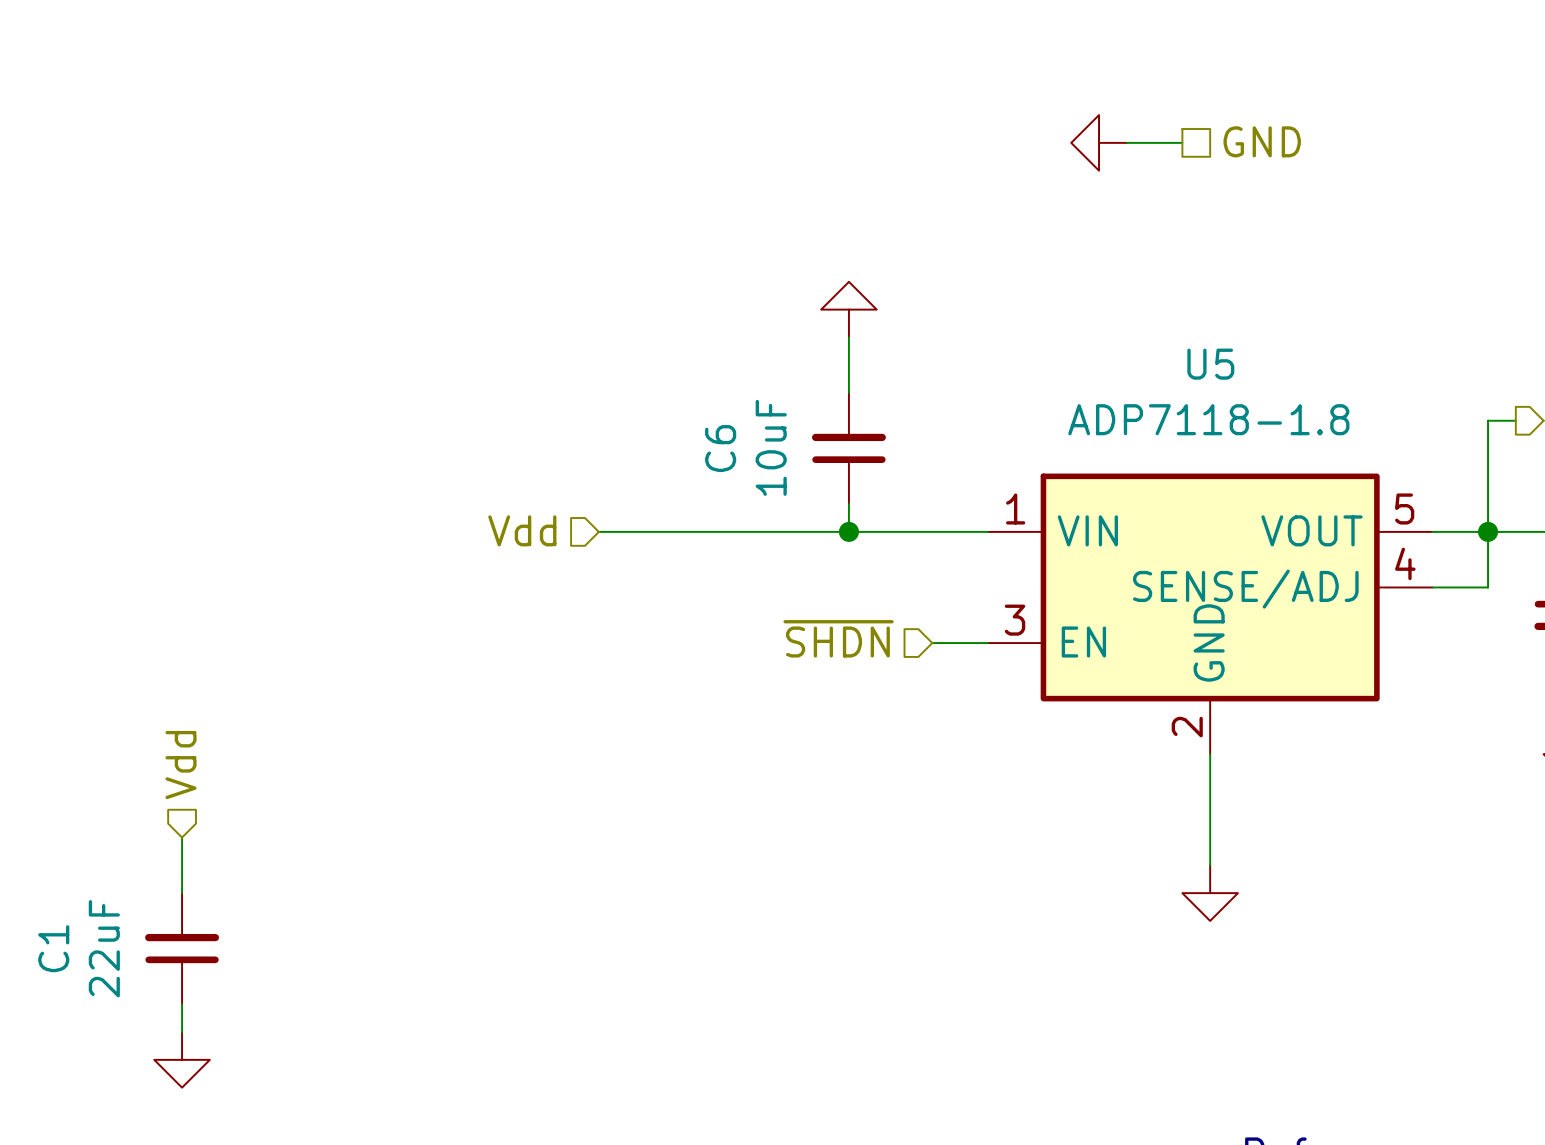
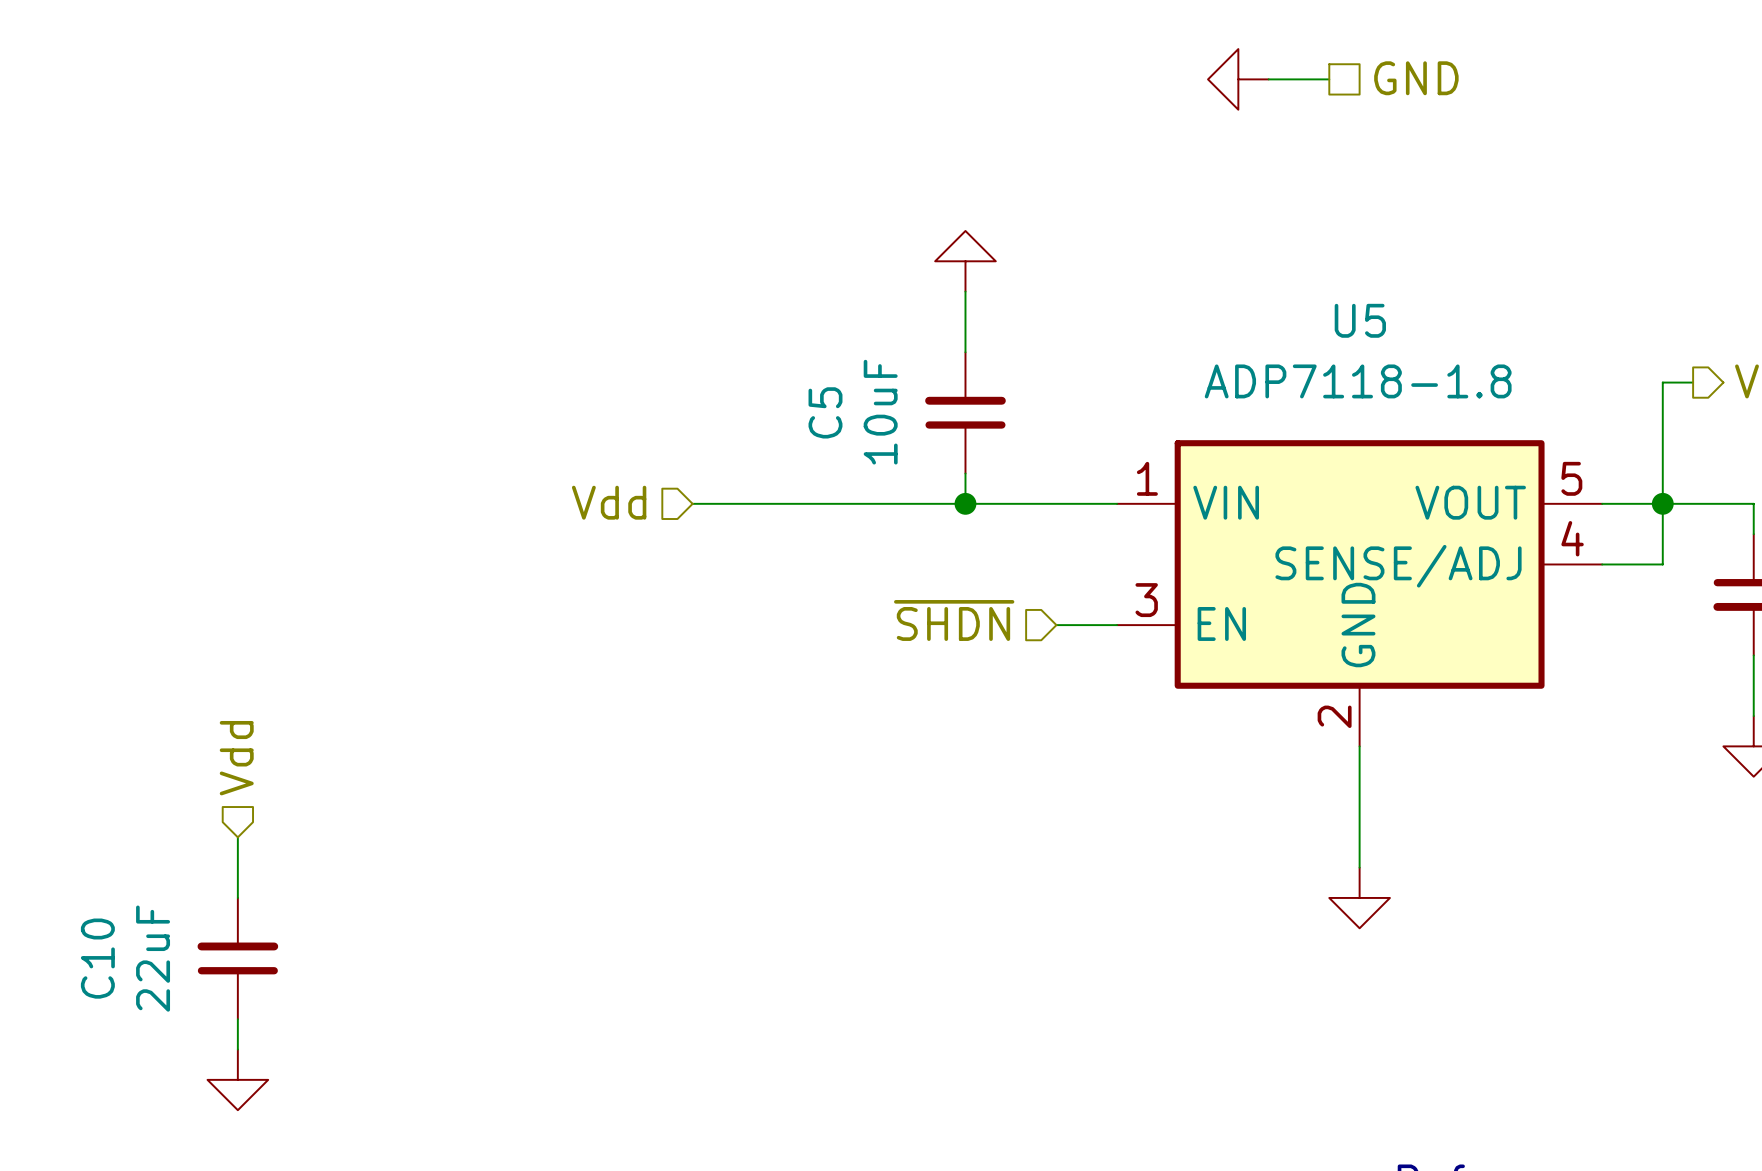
C6 name: C6 (720, 448) -> C5 (825, 412)
C1 name: C1 (53, 948) -> C10 (97, 958)

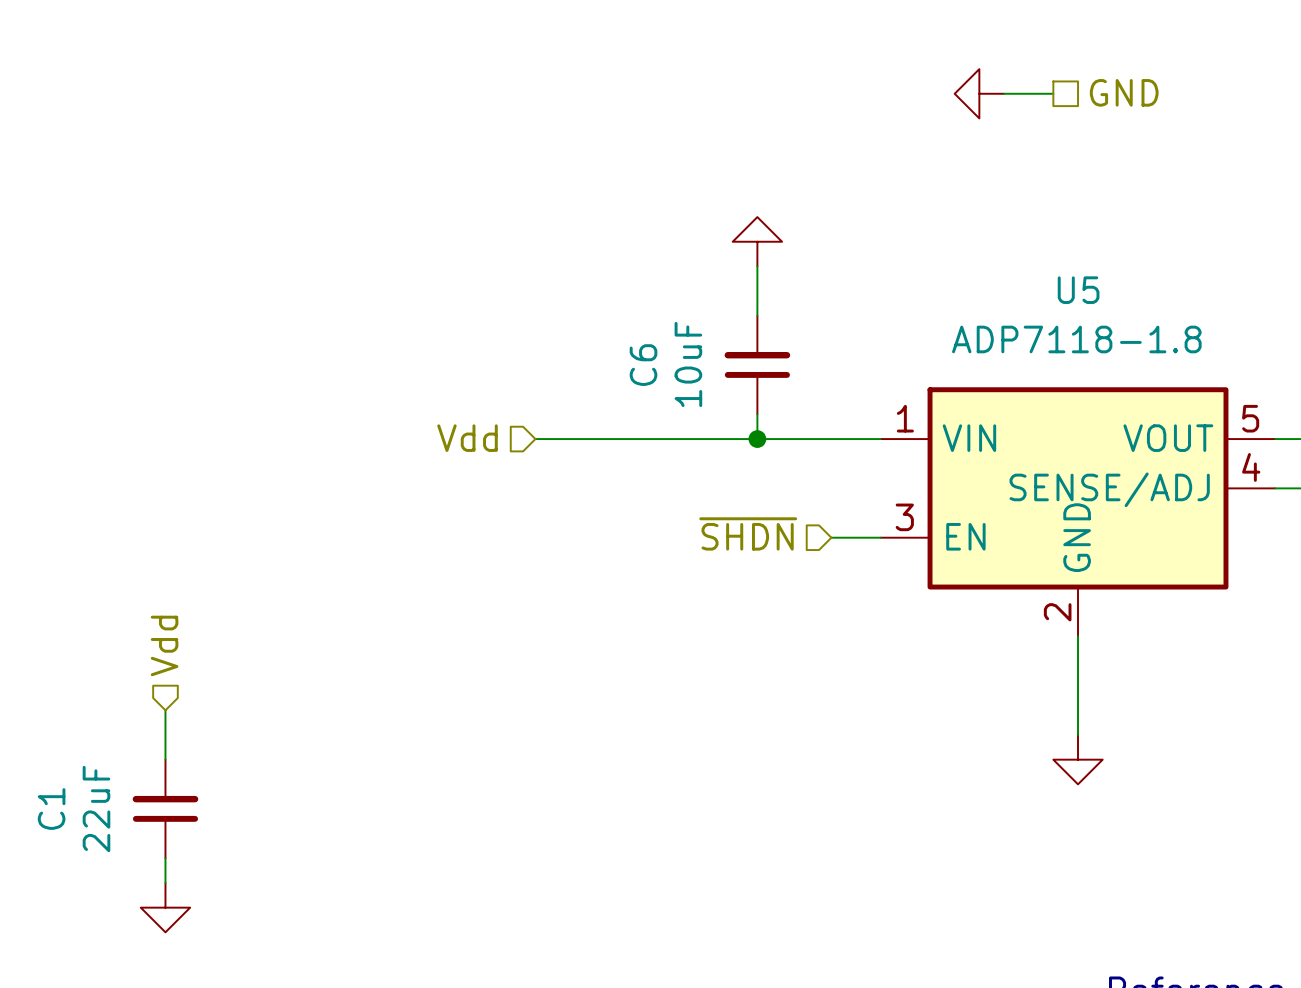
C5 name: C5 (825, 412) -> C6 (643, 365)
C10 name: C10 (97, 958) -> C1 (51, 809)

